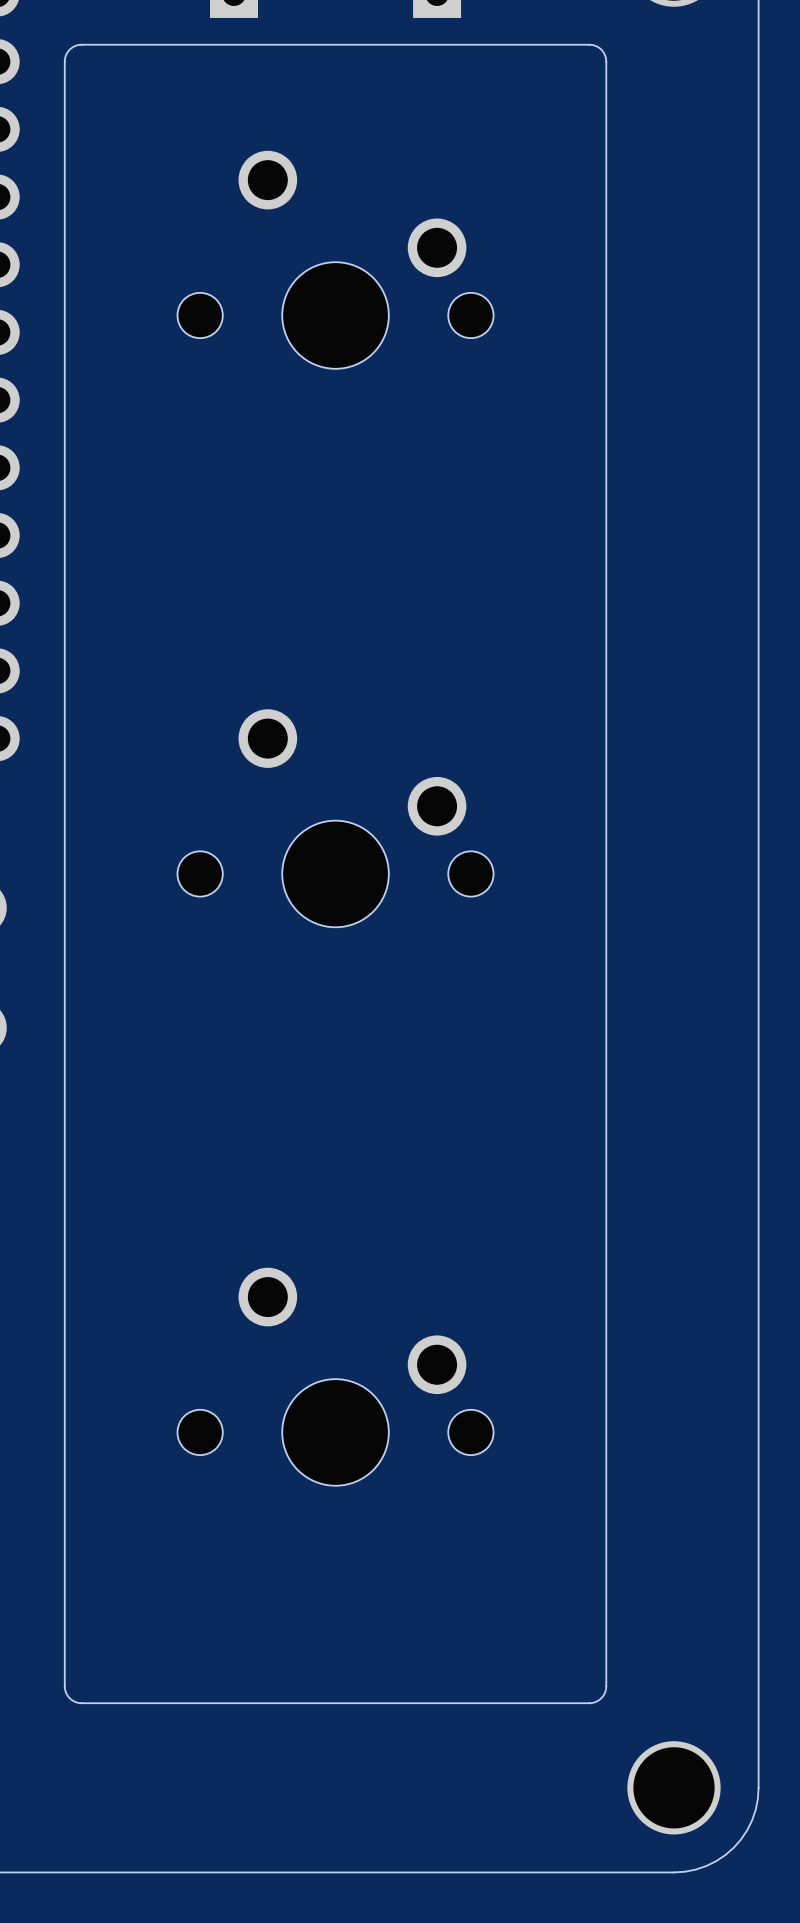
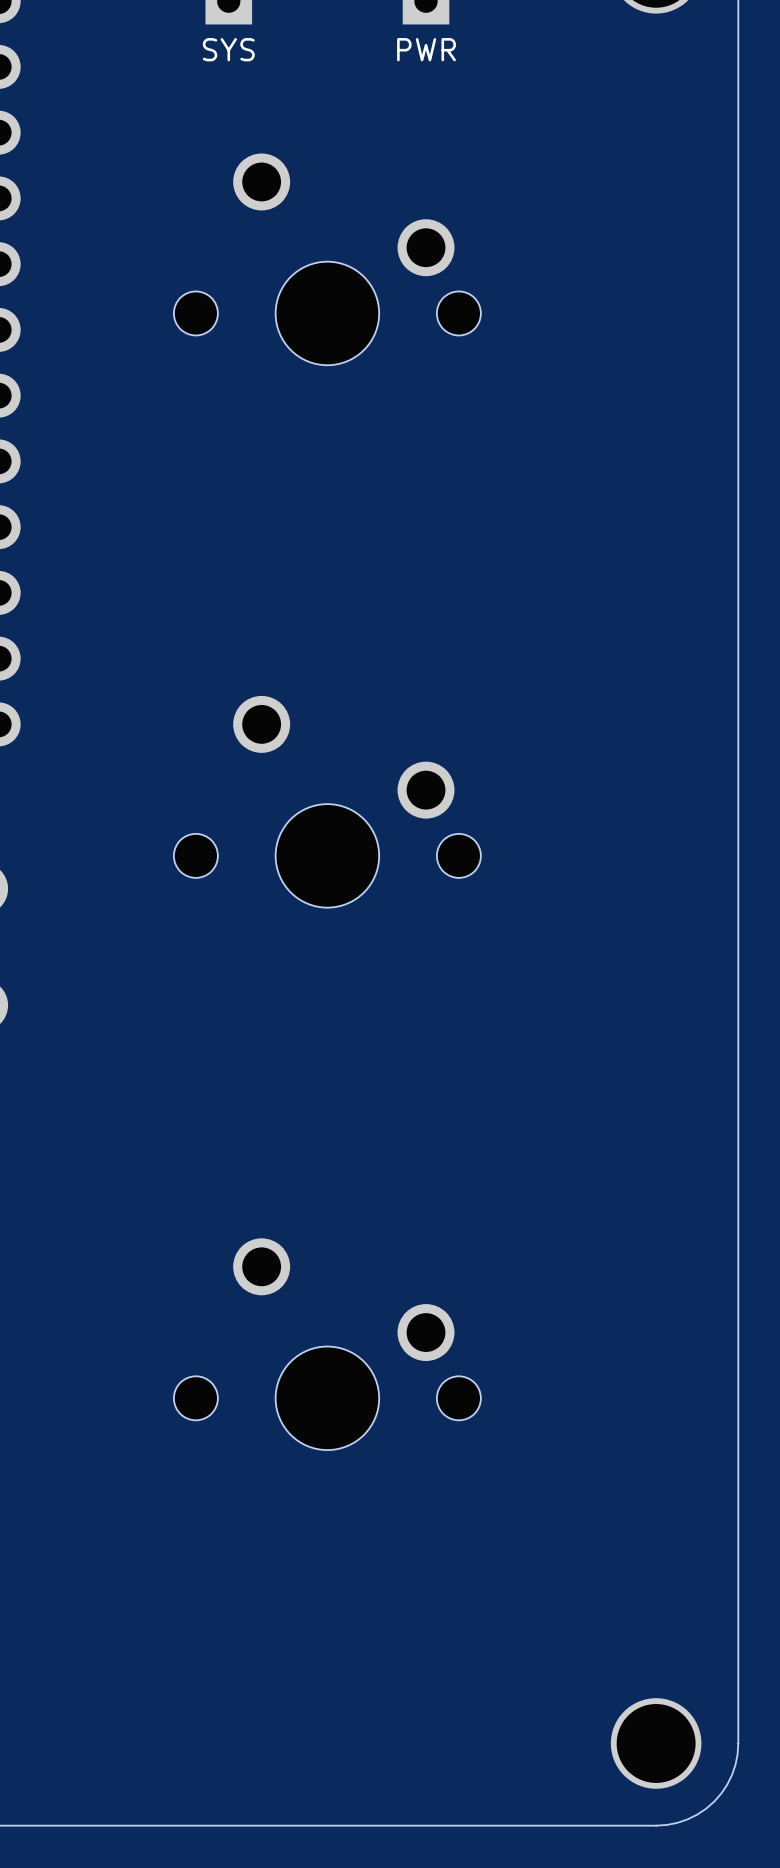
text: none -> SYS (228, 49)
text: none -> PWR (426, 49)
board edge: (589, 44) (81, 44) (71, 48) (65, 57) (64, 1686) (68, 1696) (77, 1702) (589, 1703) (599, 1699) (605, 1690) (606, 61) (601, 49) (589, 44) -> none

